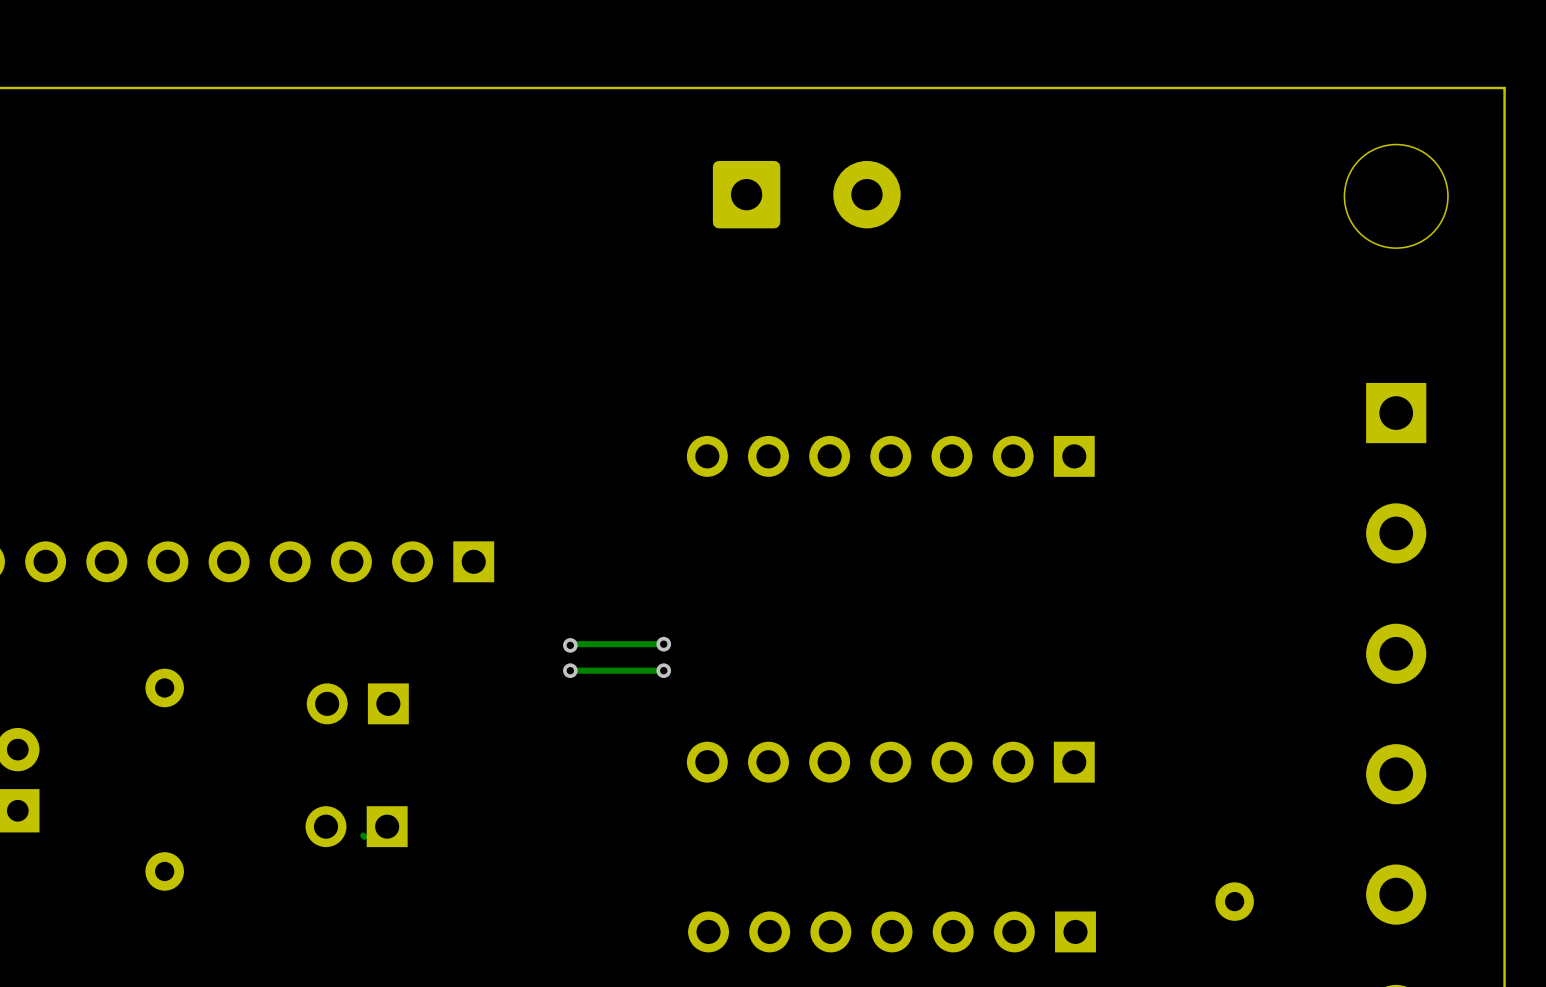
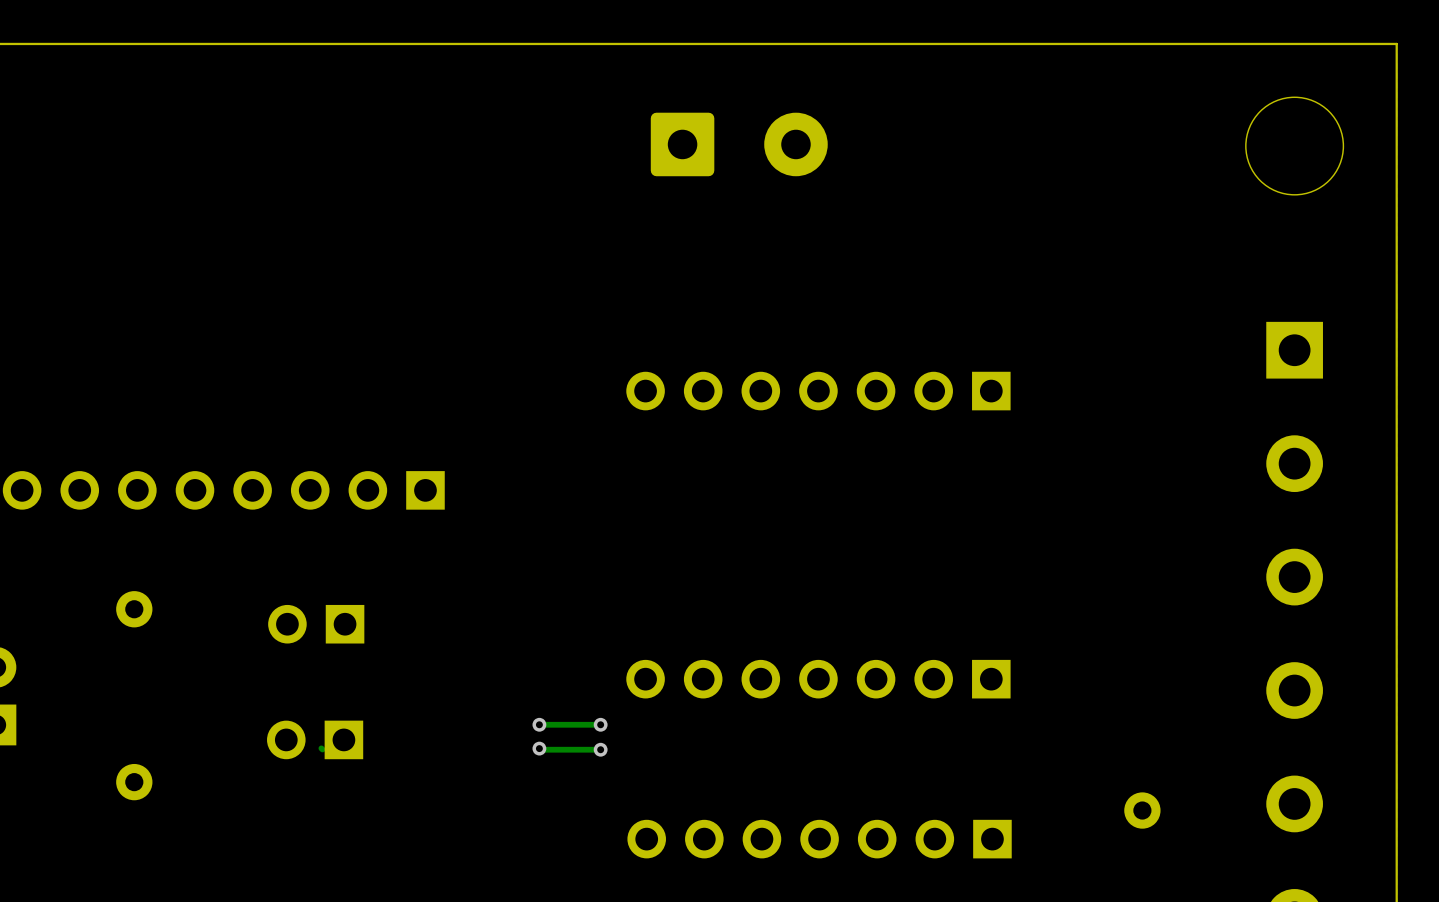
track: (663, 644) (570, 645) -> none
via: (663, 644) -> none
via: (570, 645) -> none
via: (570, 670) -> none
track: (663, 670) (570, 670) -> none
via: (663, 670) -> none
via: none -> (539, 724)
track: none -> (600, 724) (539, 724)
via: none -> (600, 724)
track: none -> (539, 748) (600, 749)
via: none -> (539, 748)
via: none -> (600, 749)

